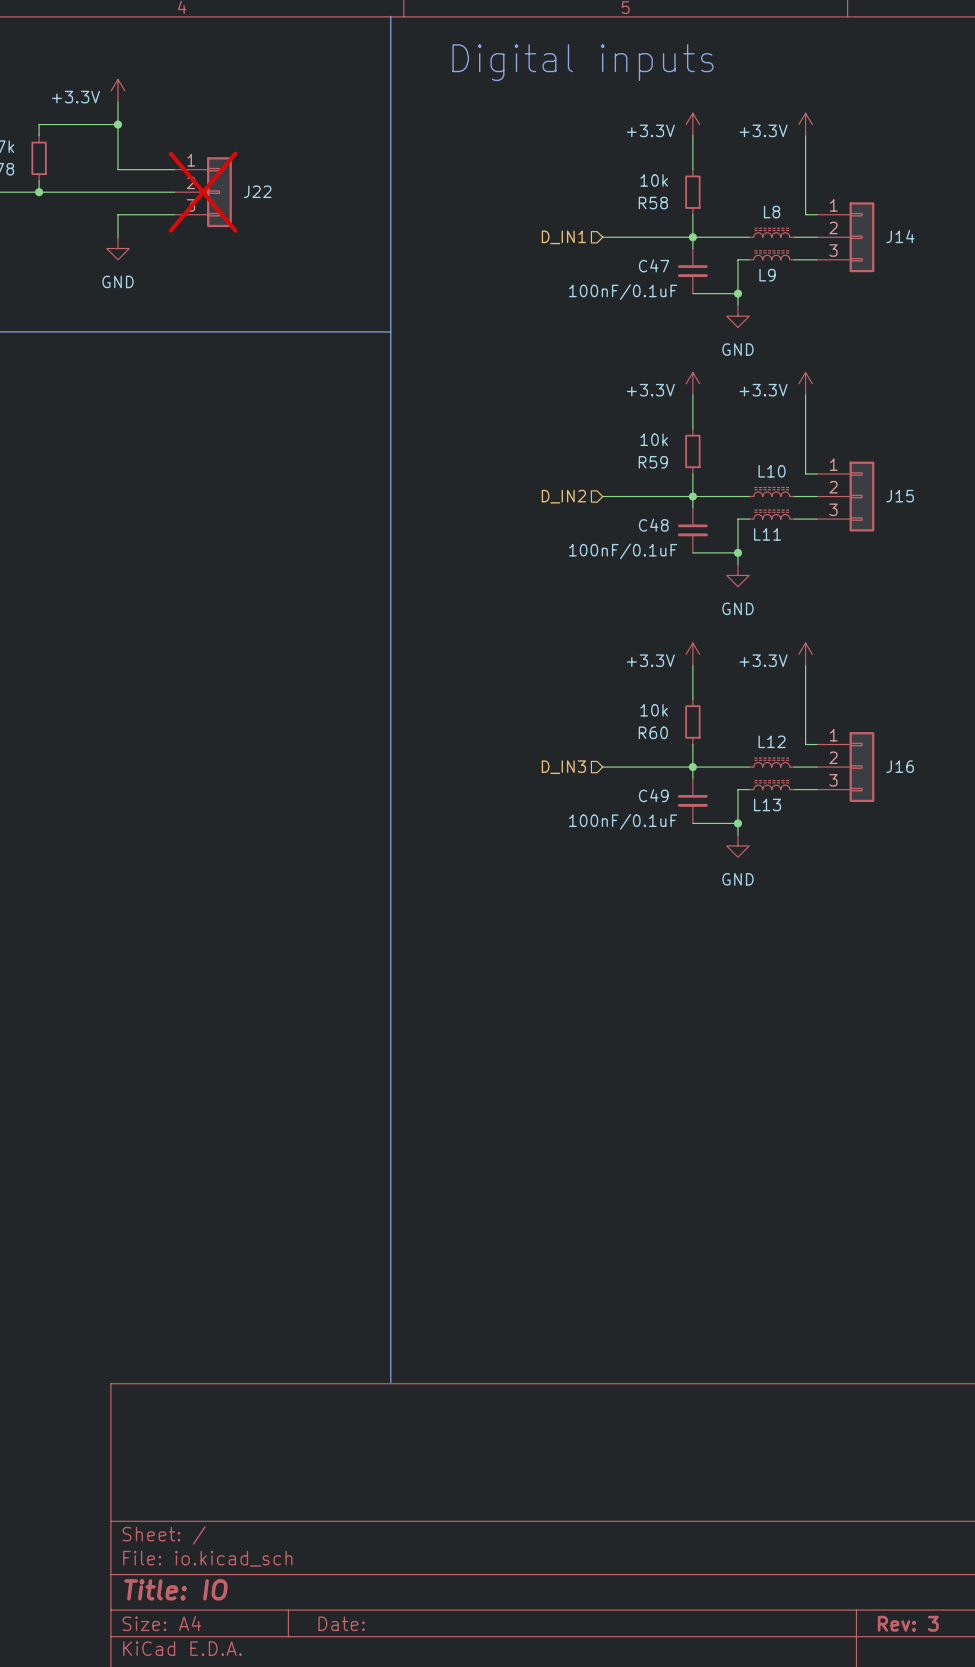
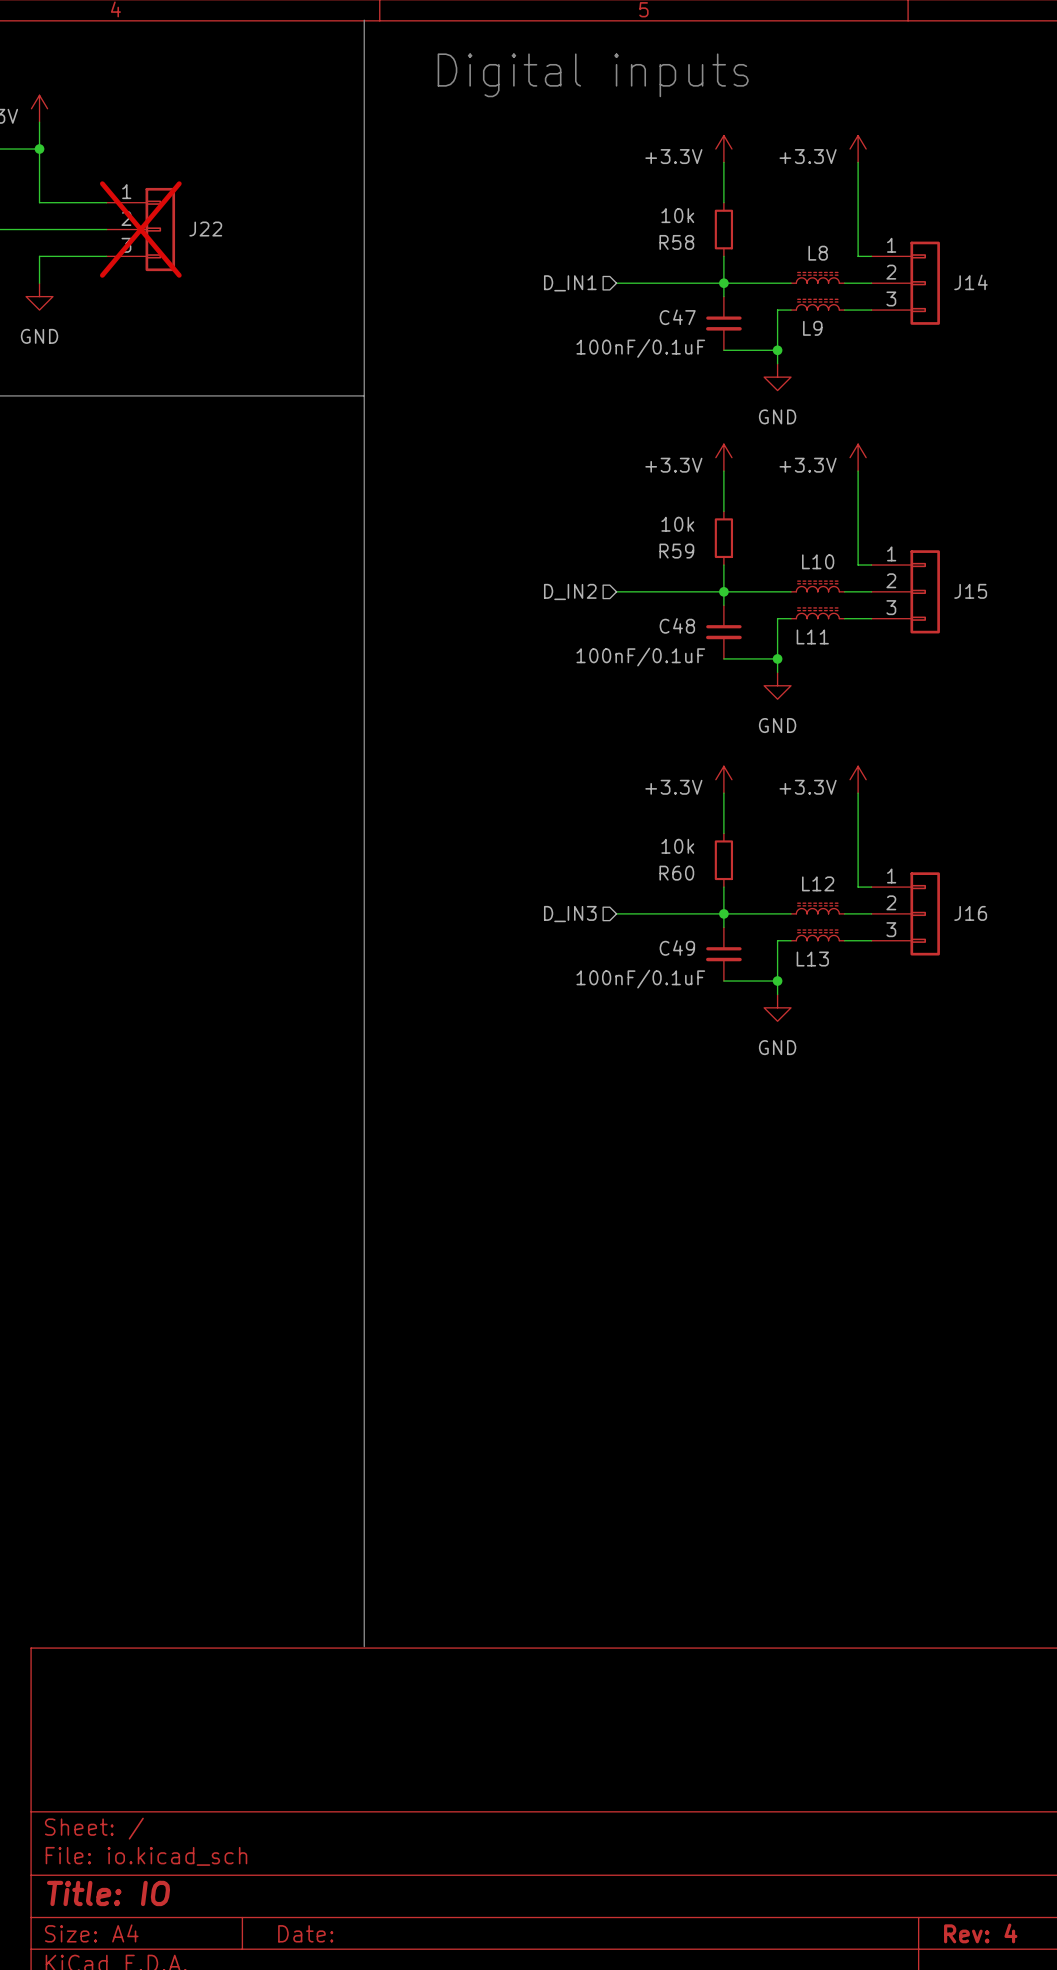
title block: Rev: 3 (908, 1623) -> Rev: 4 (980, 1933)

